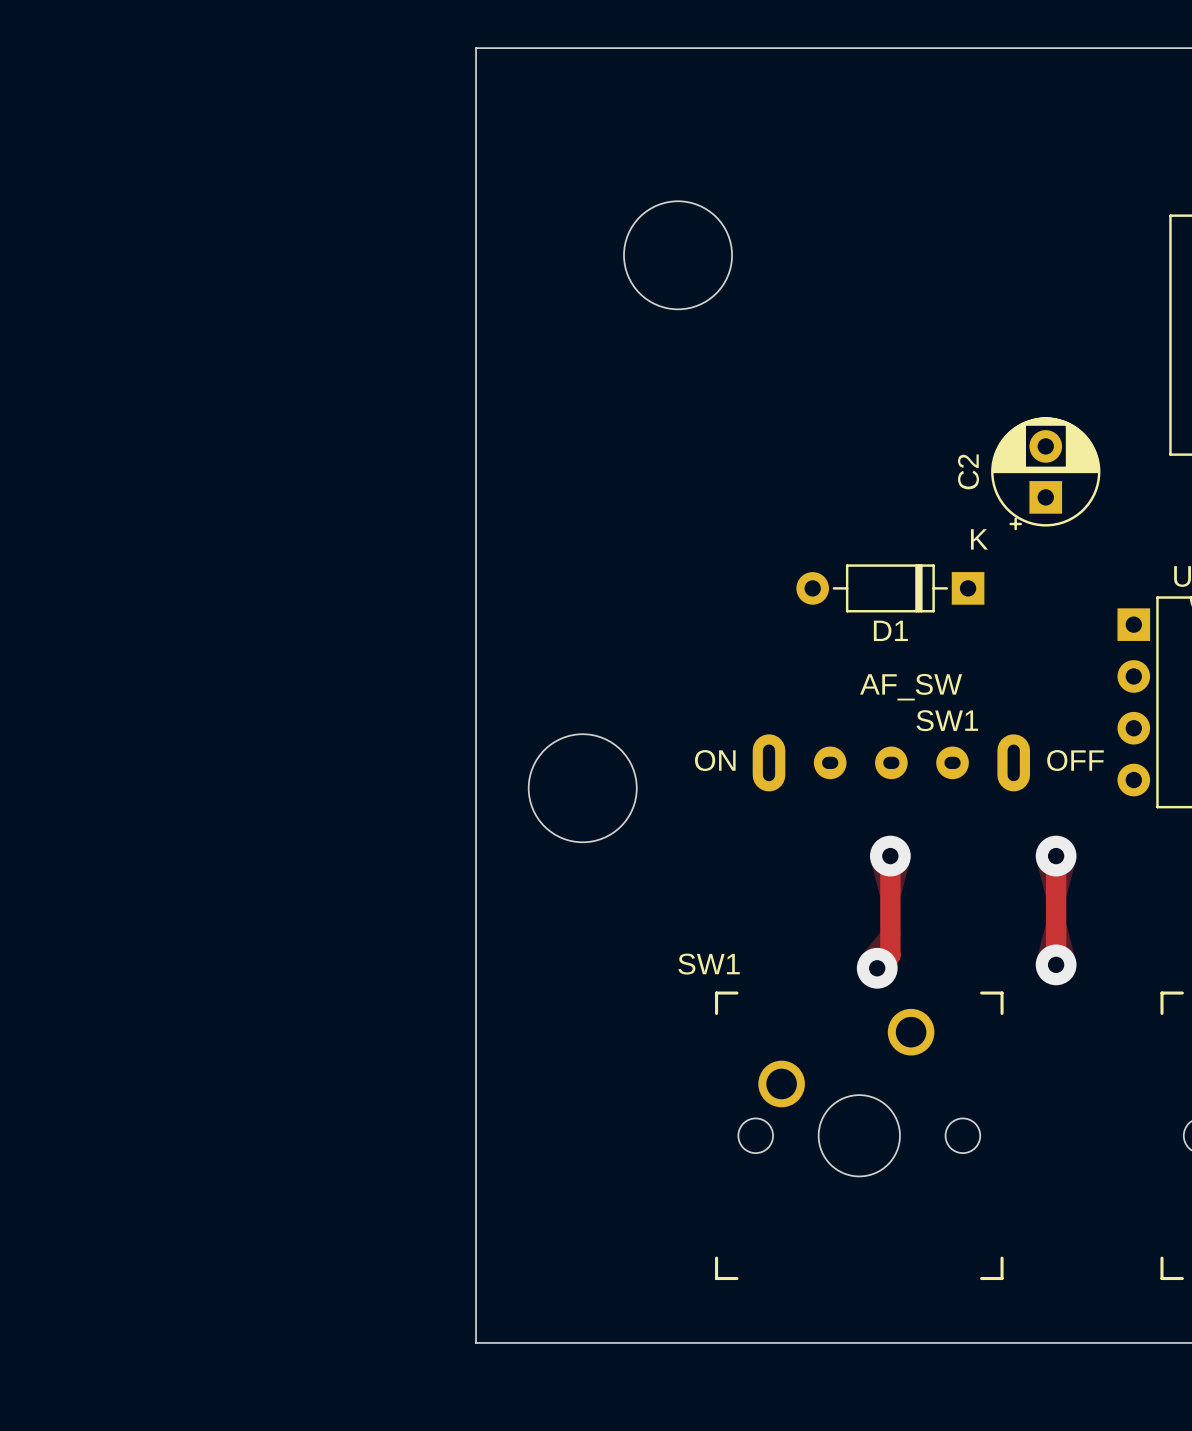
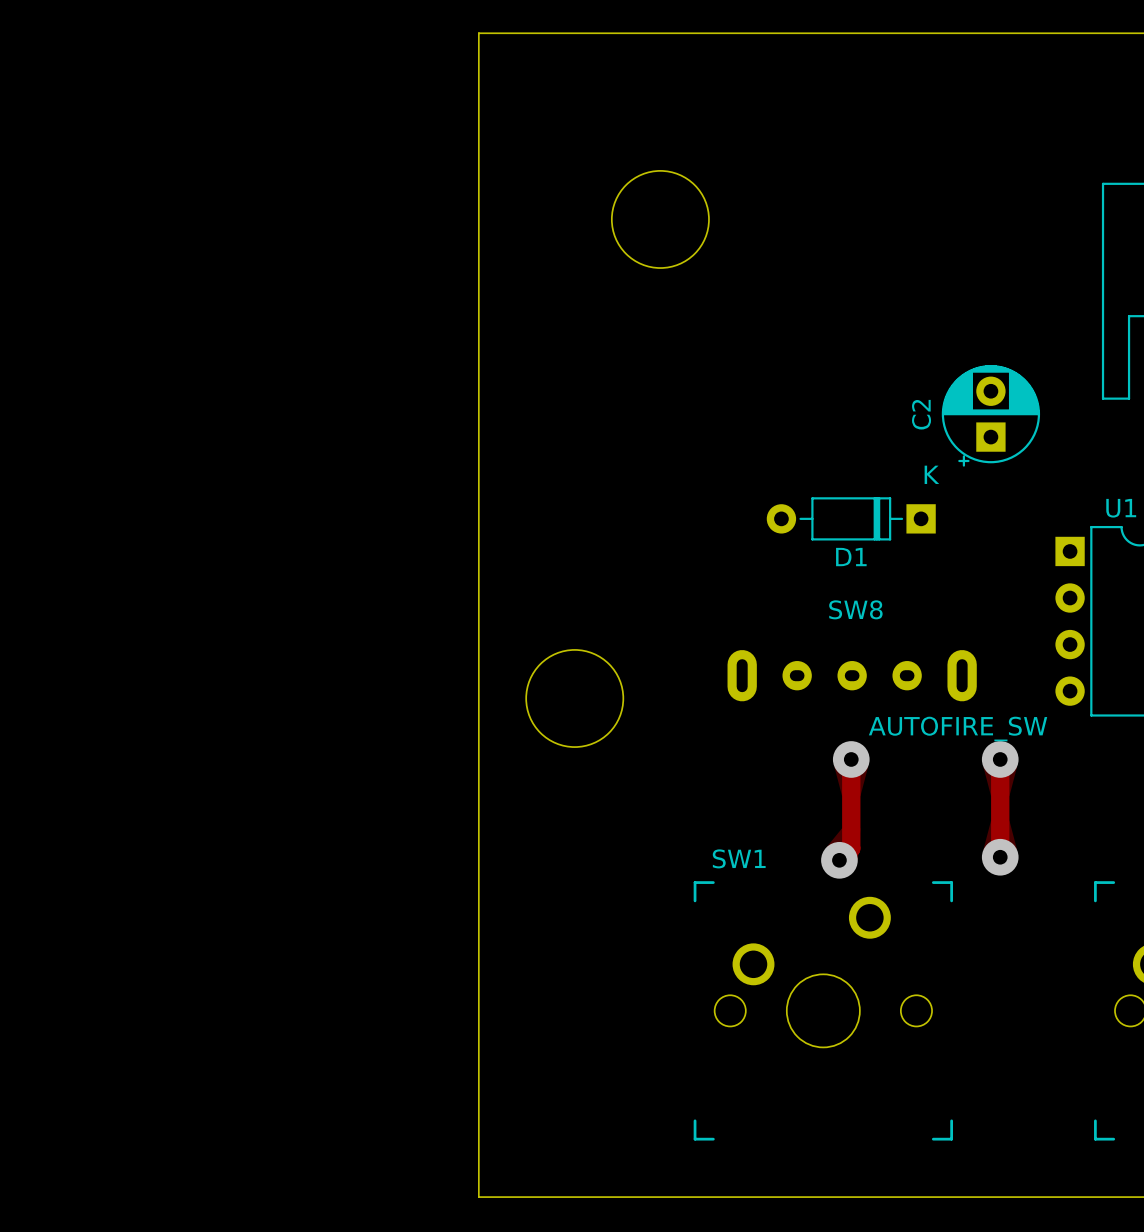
SW1 value: AF_SW (911, 687) -> AUTOFIRE_SW (958, 729)
SW1 name: SW1 (947, 720) -> SW8 (855, 609)
text: ON (715, 760) -> none
text: OFF (1075, 760) -> none
SW1 name position: SW1 (709, 964) -> SW1 (739, 858)

